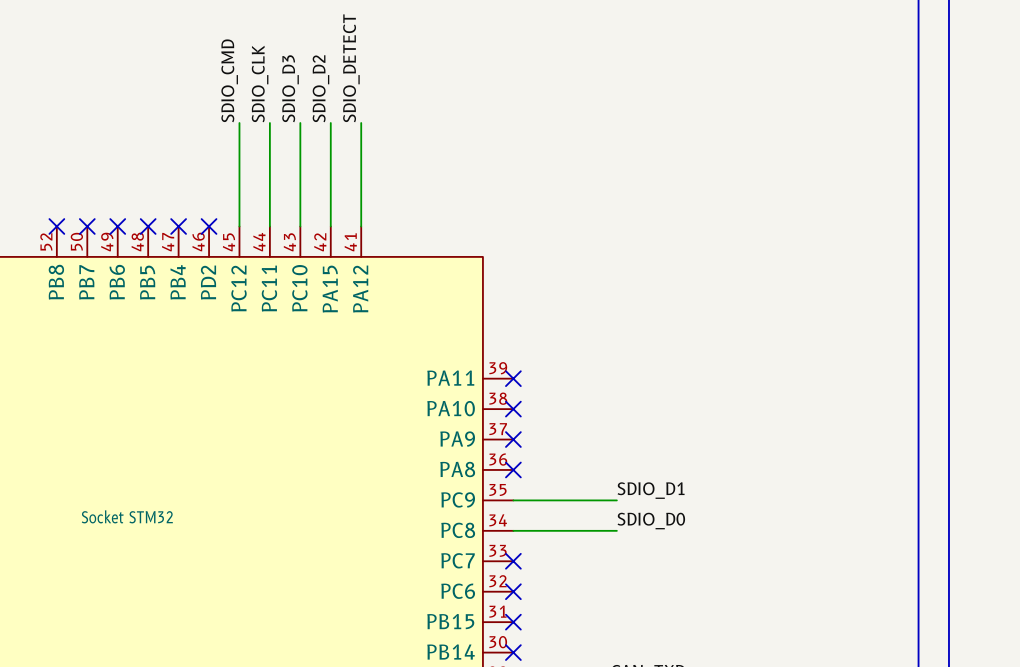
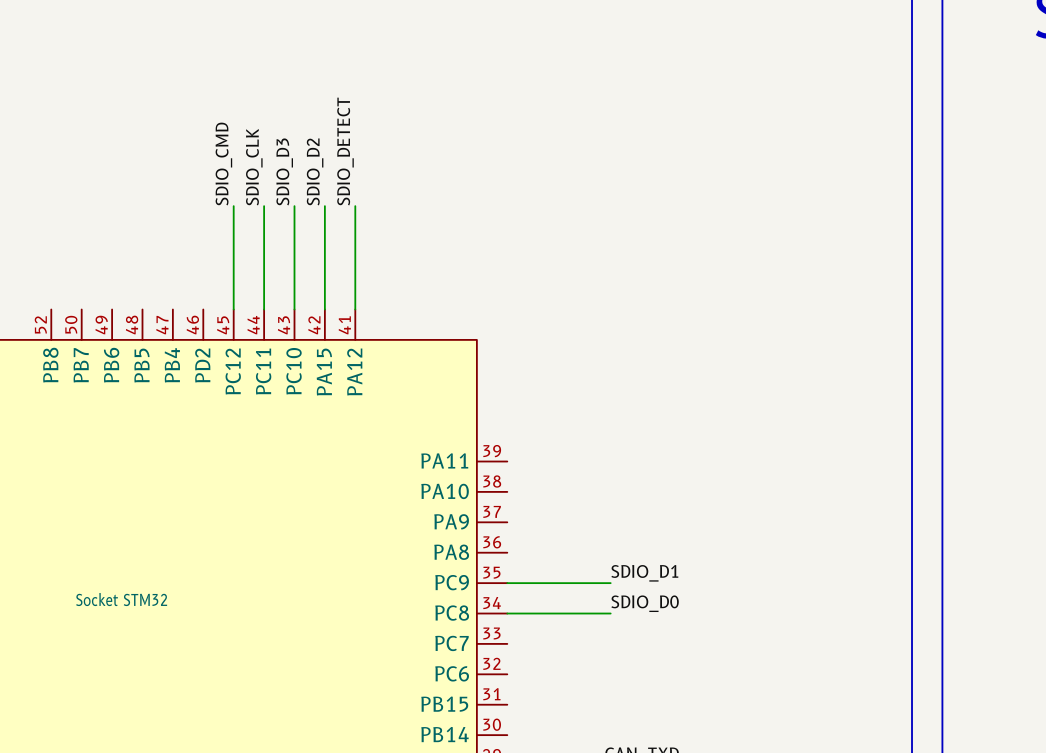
no-connect mark: (56, 226) -> none
no-connect mark: (87, 226) -> none
no-connect mark: (117, 226) -> none
no-connect mark: (148, 226) -> none
no-connect mark: (178, 226) -> none
no-connect mark: (209, 226) -> none
no-connect mark: (513, 378) -> none
no-connect mark: (513, 409) -> none
no-connect mark: (513, 439) -> none
no-connect mark: (513, 469) -> none
no-connect mark: (513, 561) -> none
no-connect mark: (513, 591) -> none
no-connect mark: (513, 622) -> none
no-connect mark: (513, 652) -> none

